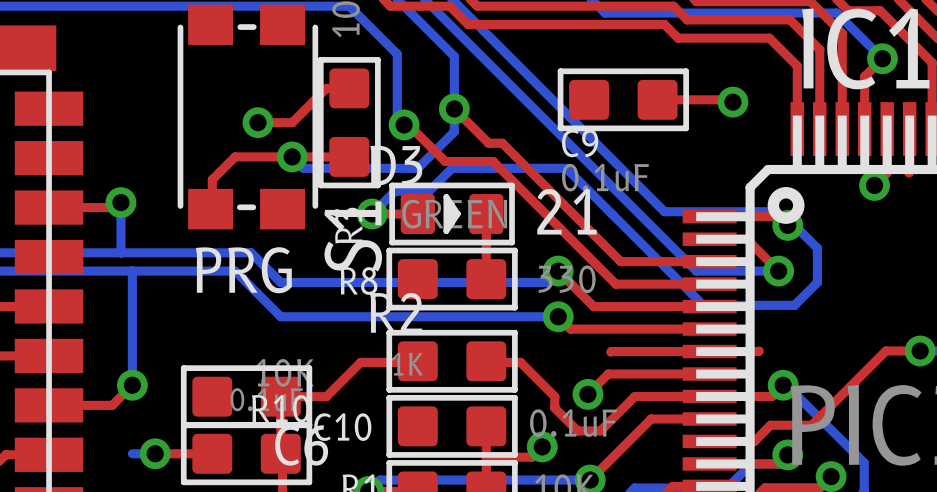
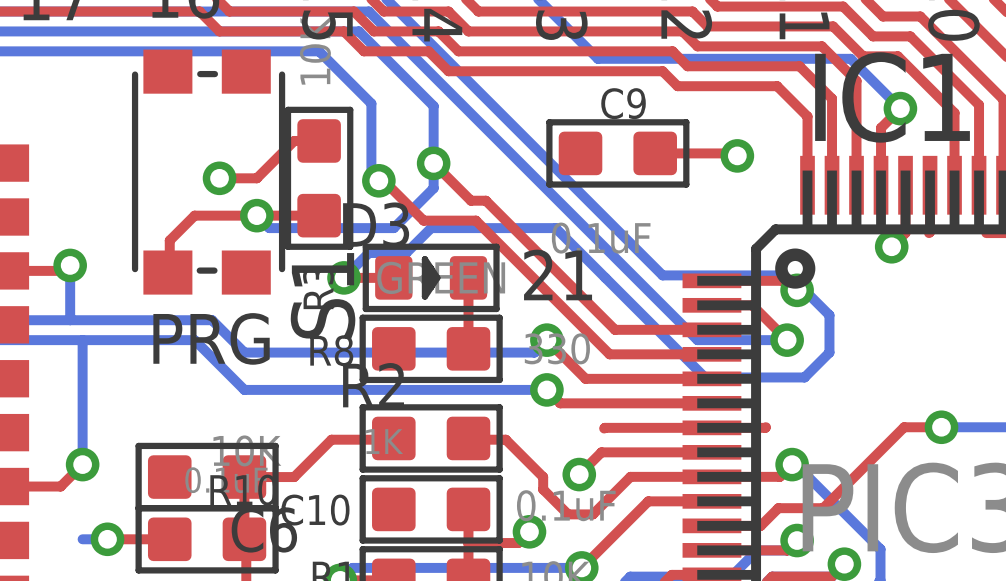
C9 name position: C9 (580, 143) -> C9 (623, 103)

